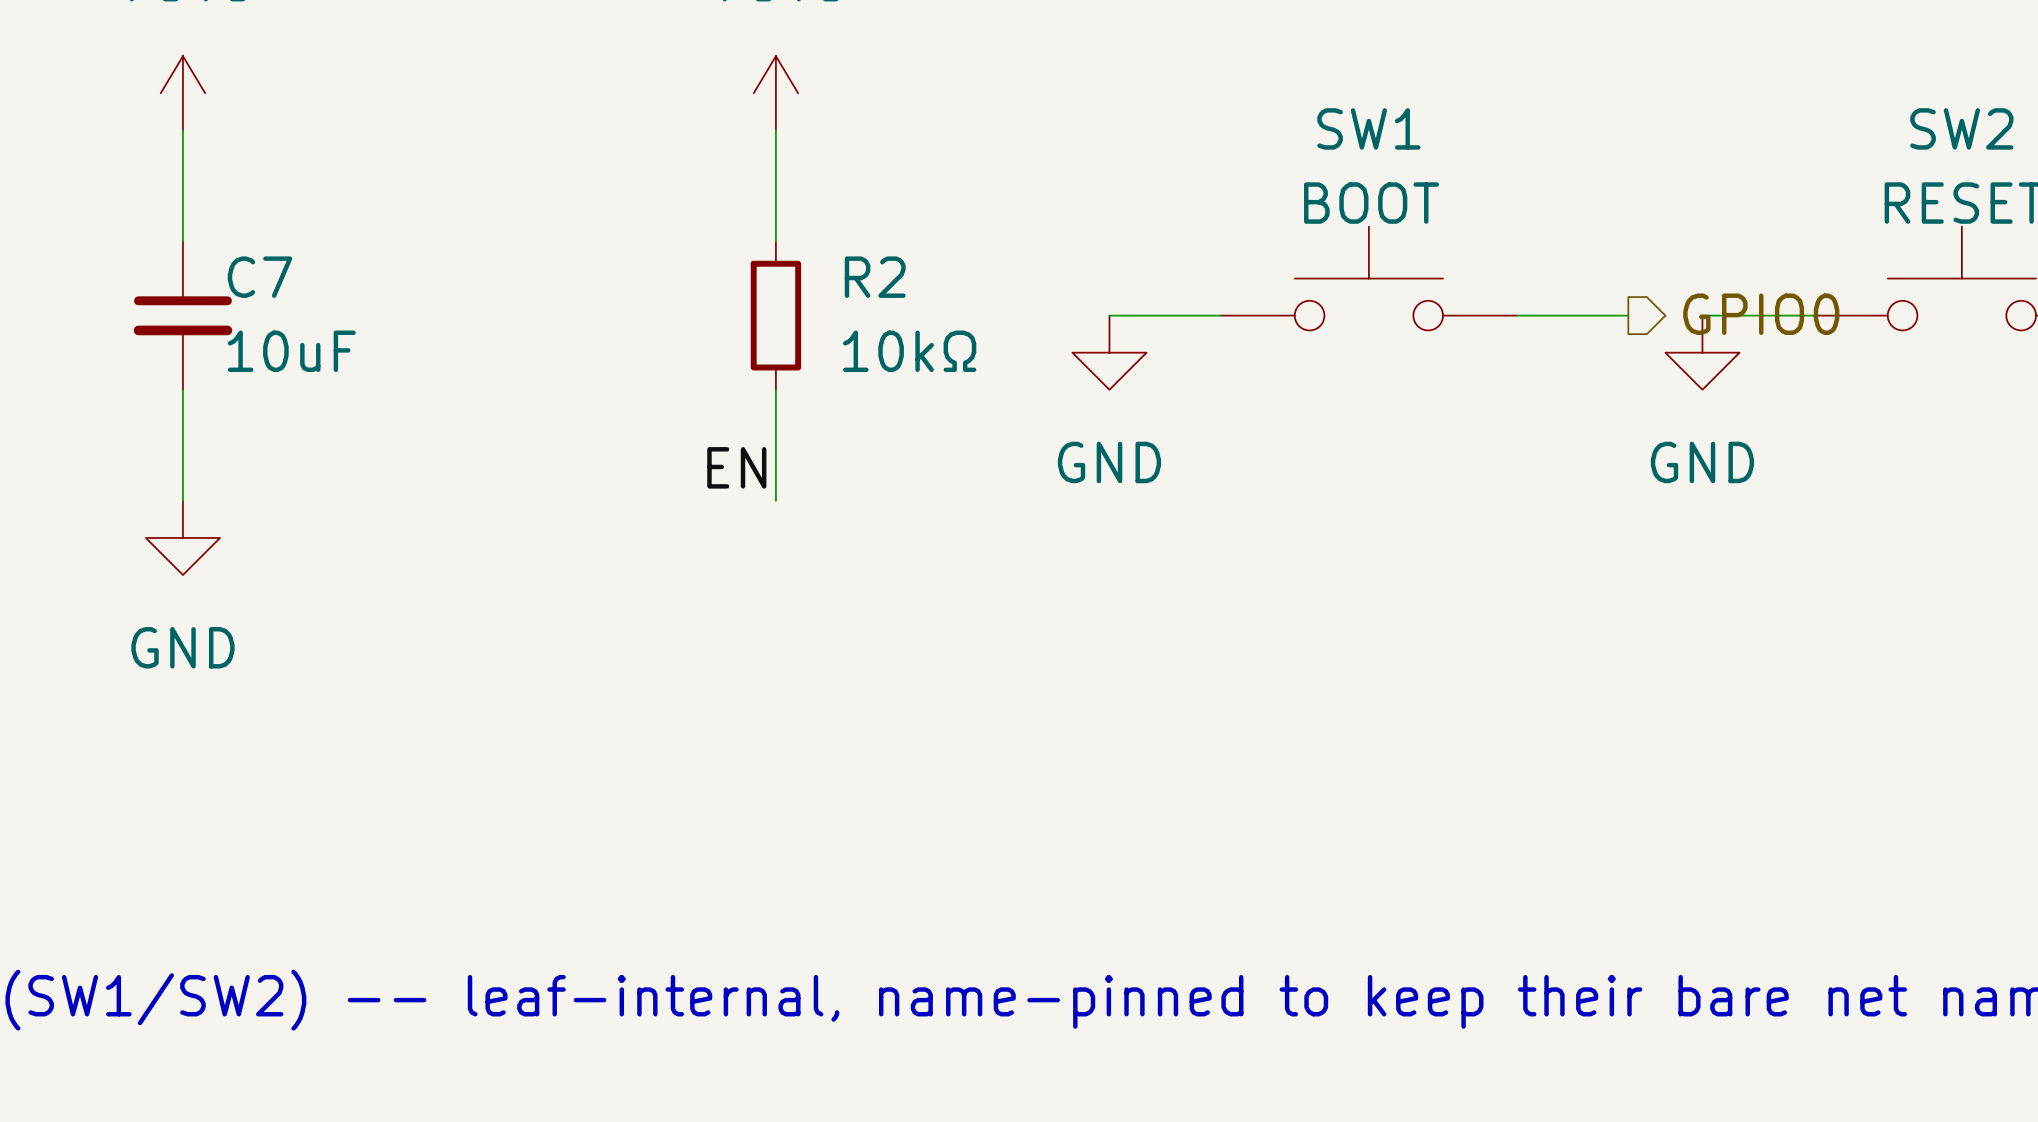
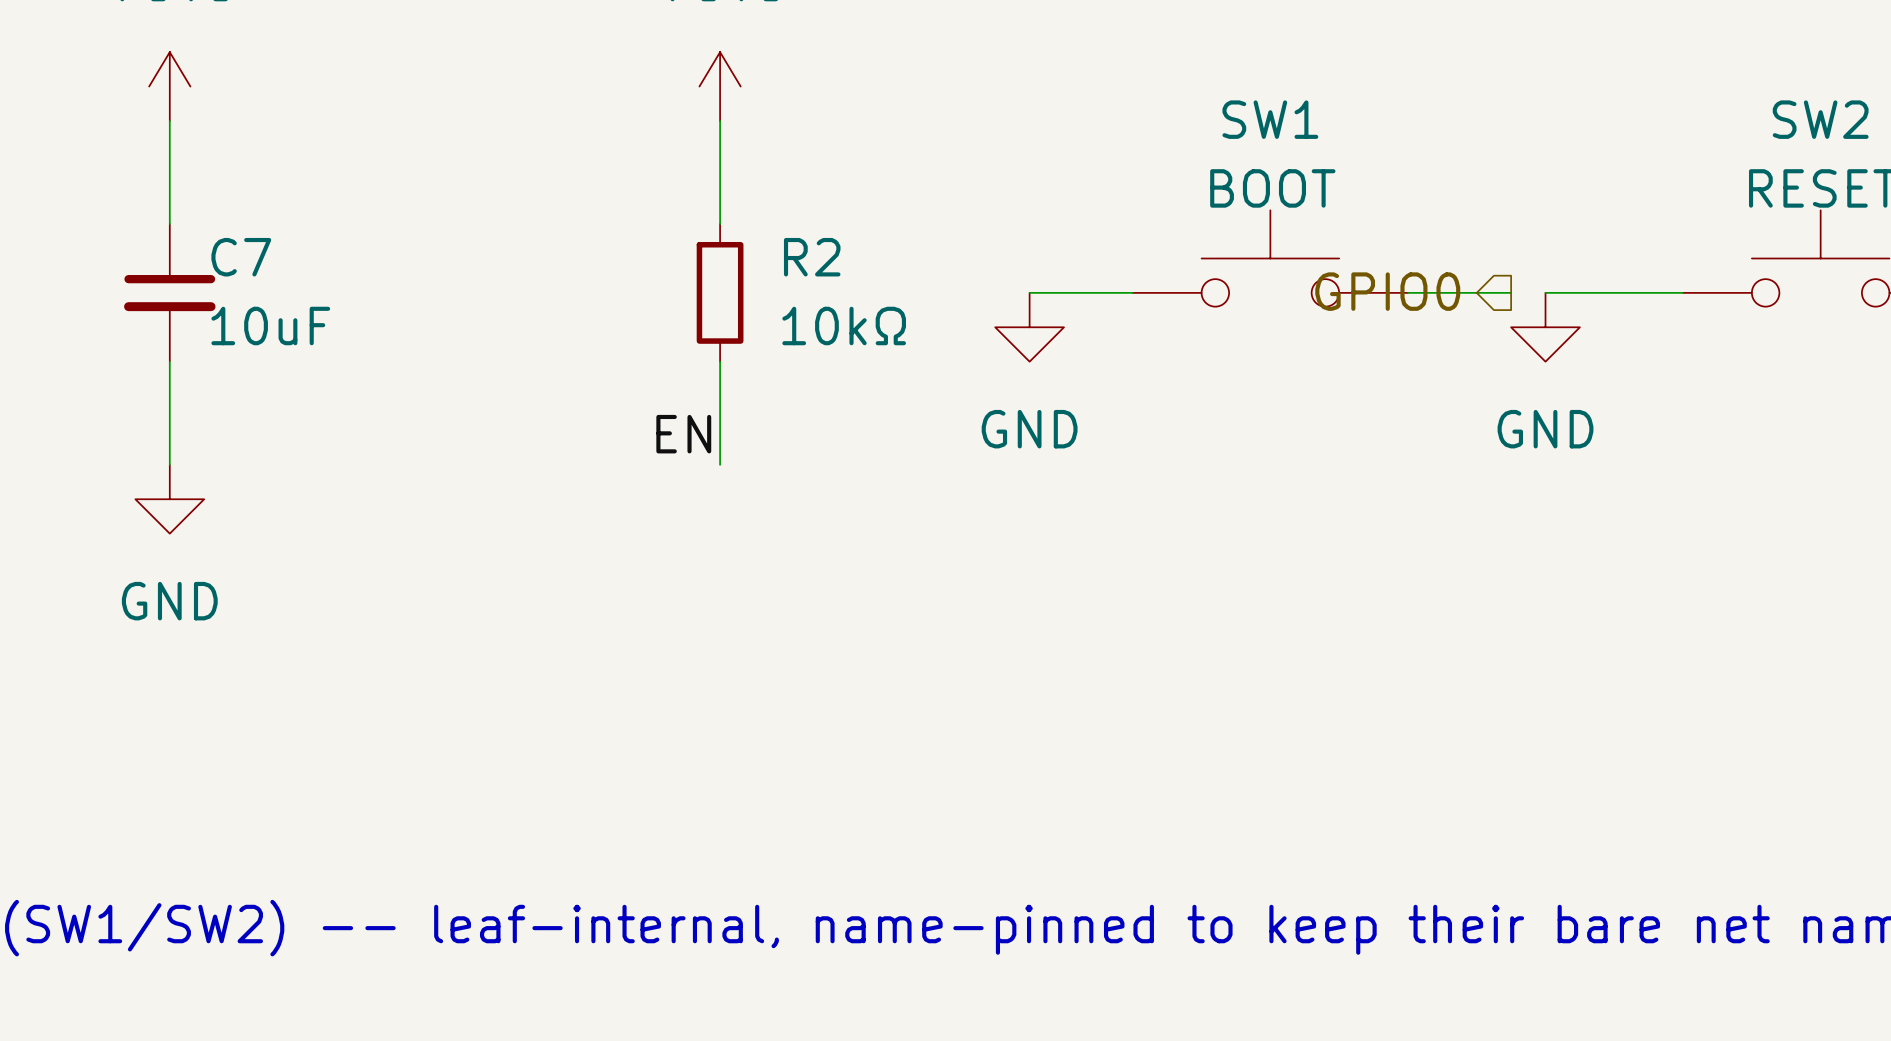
hierarchical label rotation: 0° (1761, 314) -> 180° (1387, 291)
hierarchical label position: GPIO0 (1761, 314) -> GPIO0 (1387, 291)
wire: none -> (1545, 292) (1579, 292)
power symbol position: GND (1702, 352) -> GND (1545, 327)

